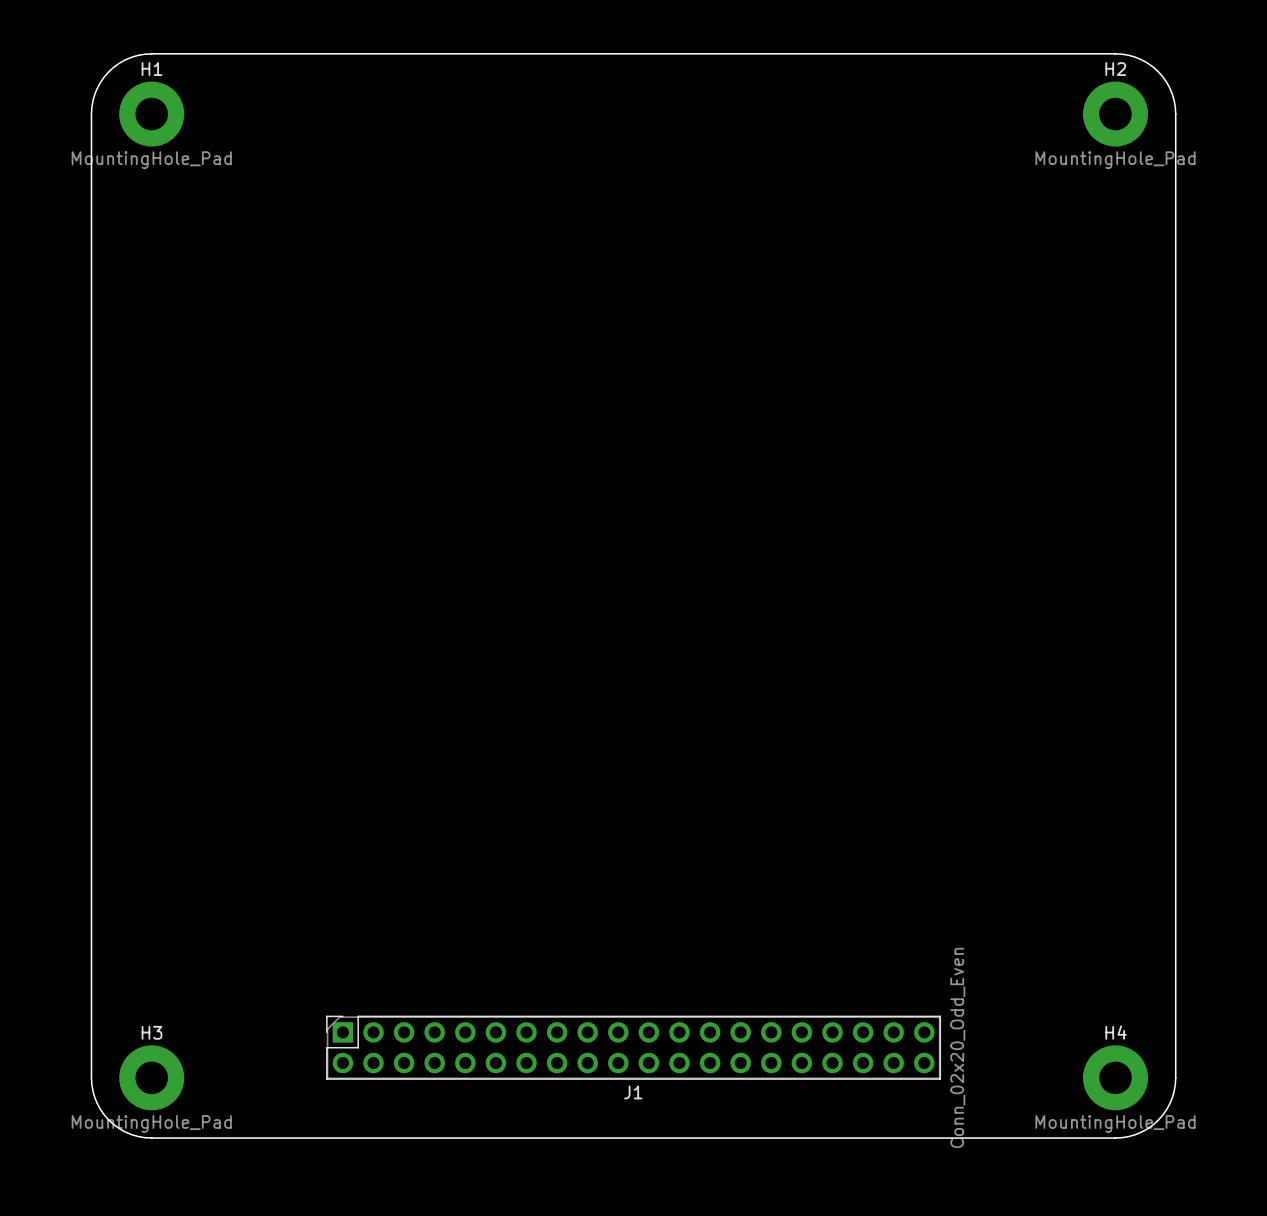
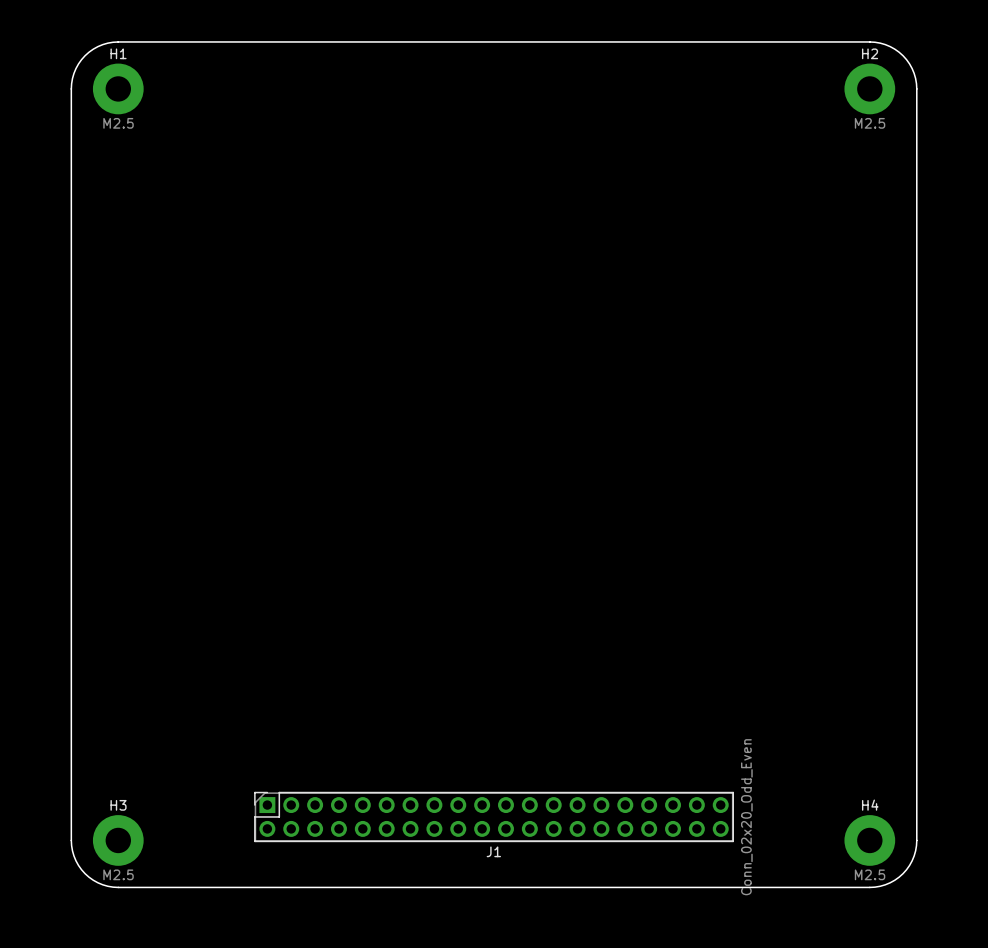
H1 value: MountingHole_Pad (151, 160) -> M2.5 (118, 123)
H2 value: MountingHole_Pad (1115, 160) -> M2.5 (870, 123)
H3 value: MountingHole_Pad (151, 1123) -> M2.5 (118, 874)
H4 value: MountingHole_Pad (1115, 1123) -> M2.5 (870, 874)

